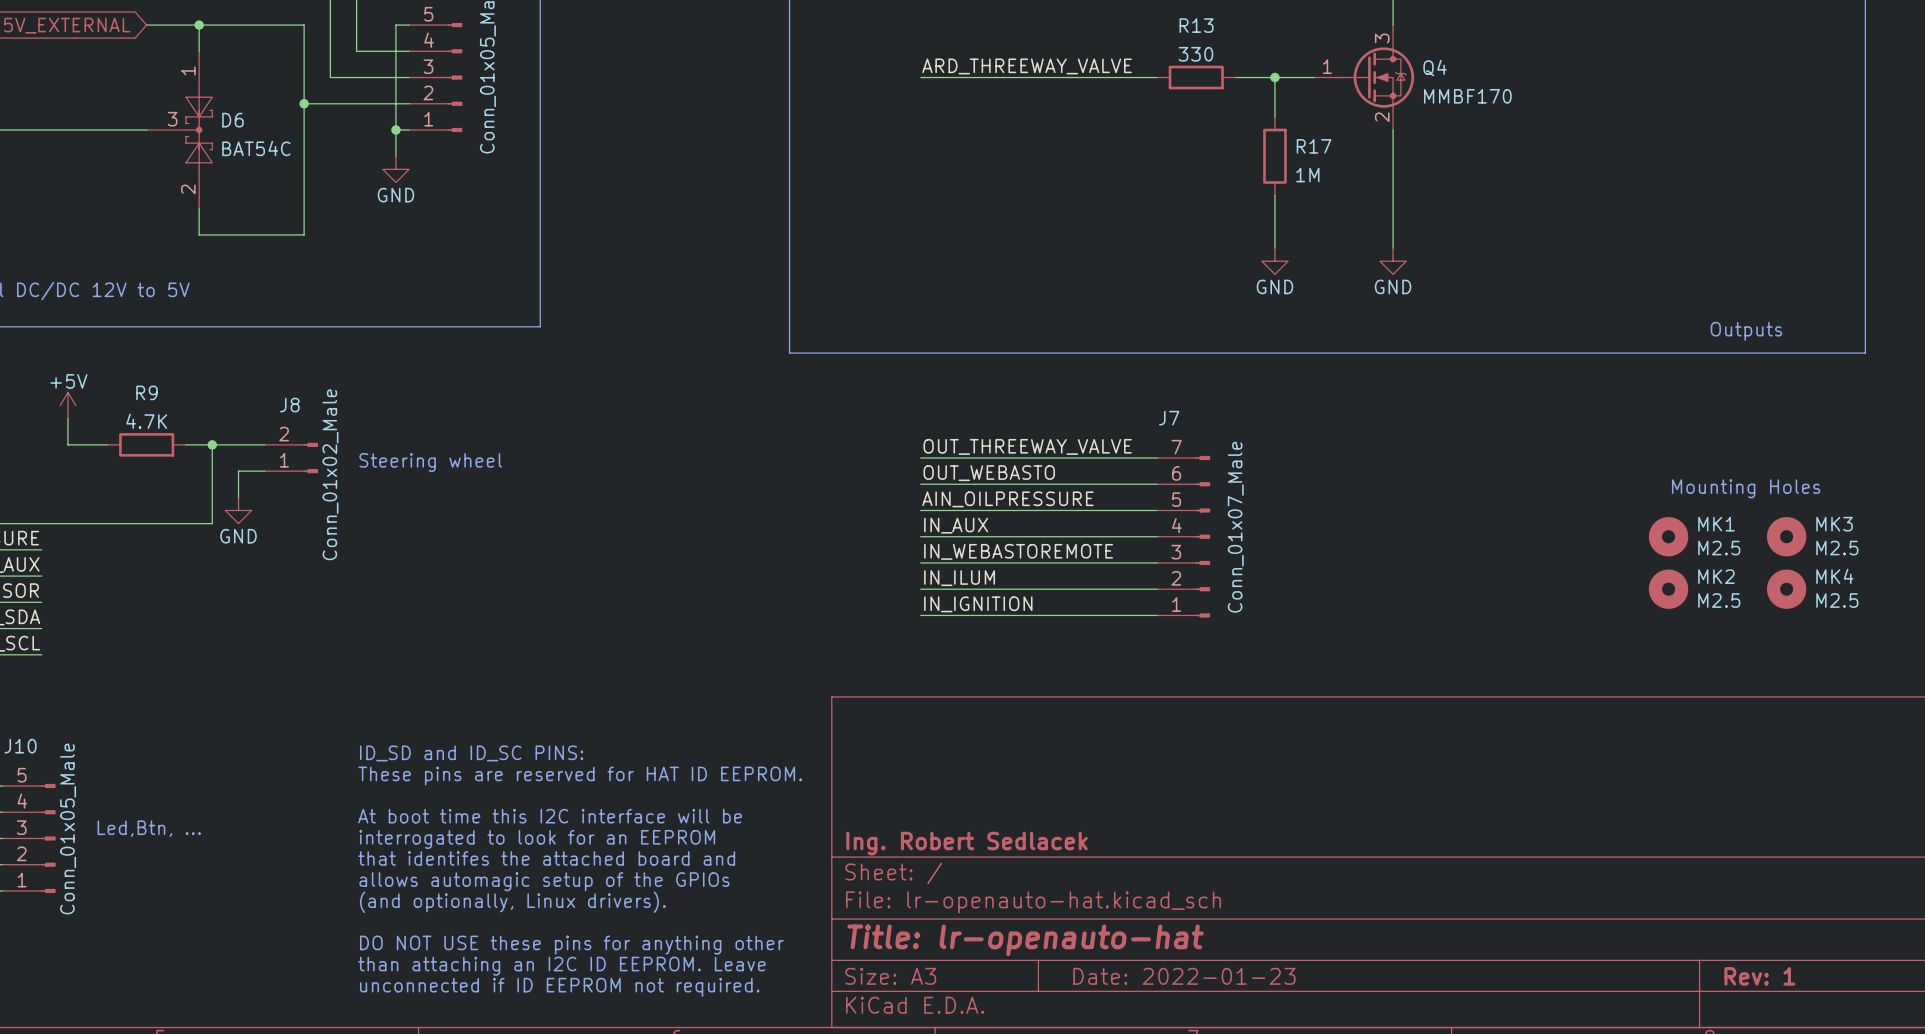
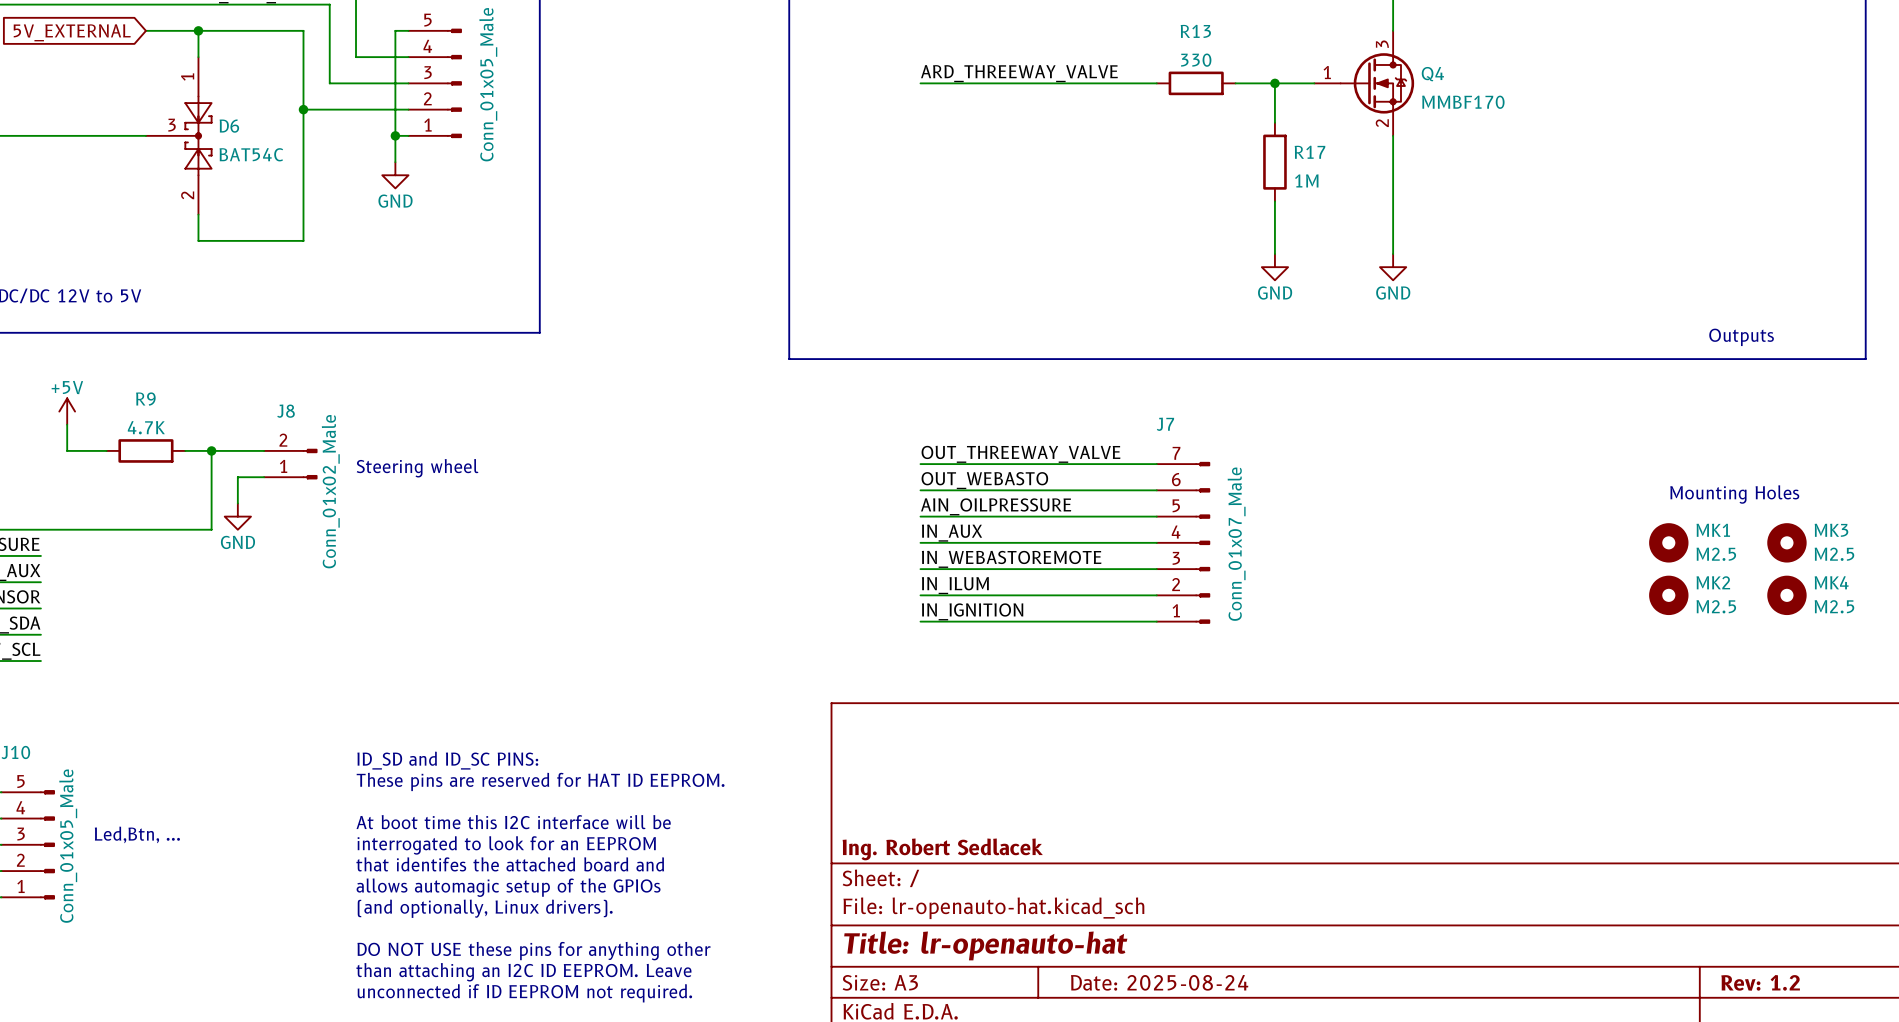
title block: Date: 2022-01-23 (1184, 976) -> Date: 2025-08-24 (1159, 982)
title block: Rev: 1 (1759, 976) -> Rev: 1.2 (1760, 982)

